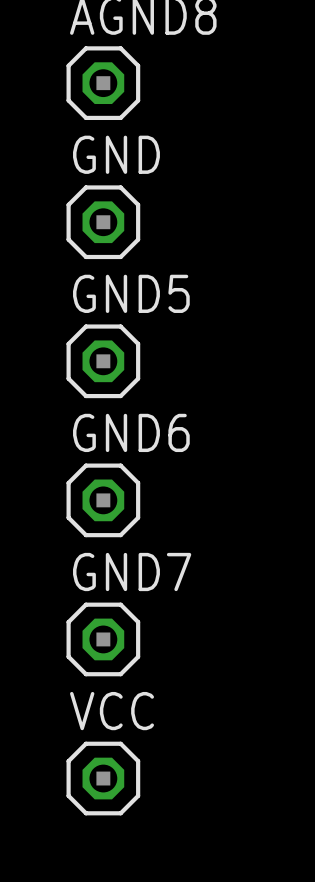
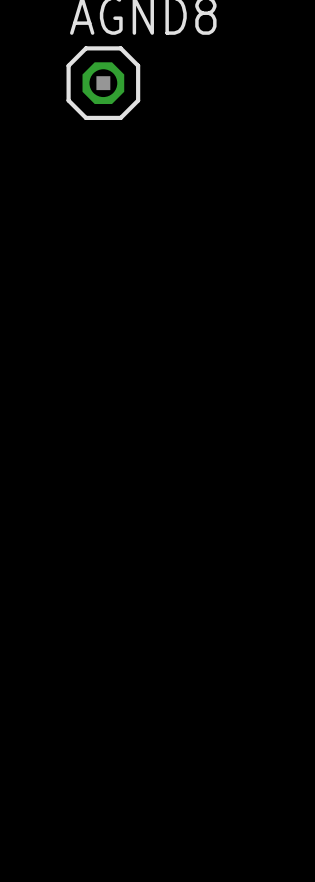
GND: (103, 222) -> none
GND5: (103, 361) -> none
GND6: (103, 500) -> none
GND7: (103, 639) -> none
VCC: (103, 778) -> none

